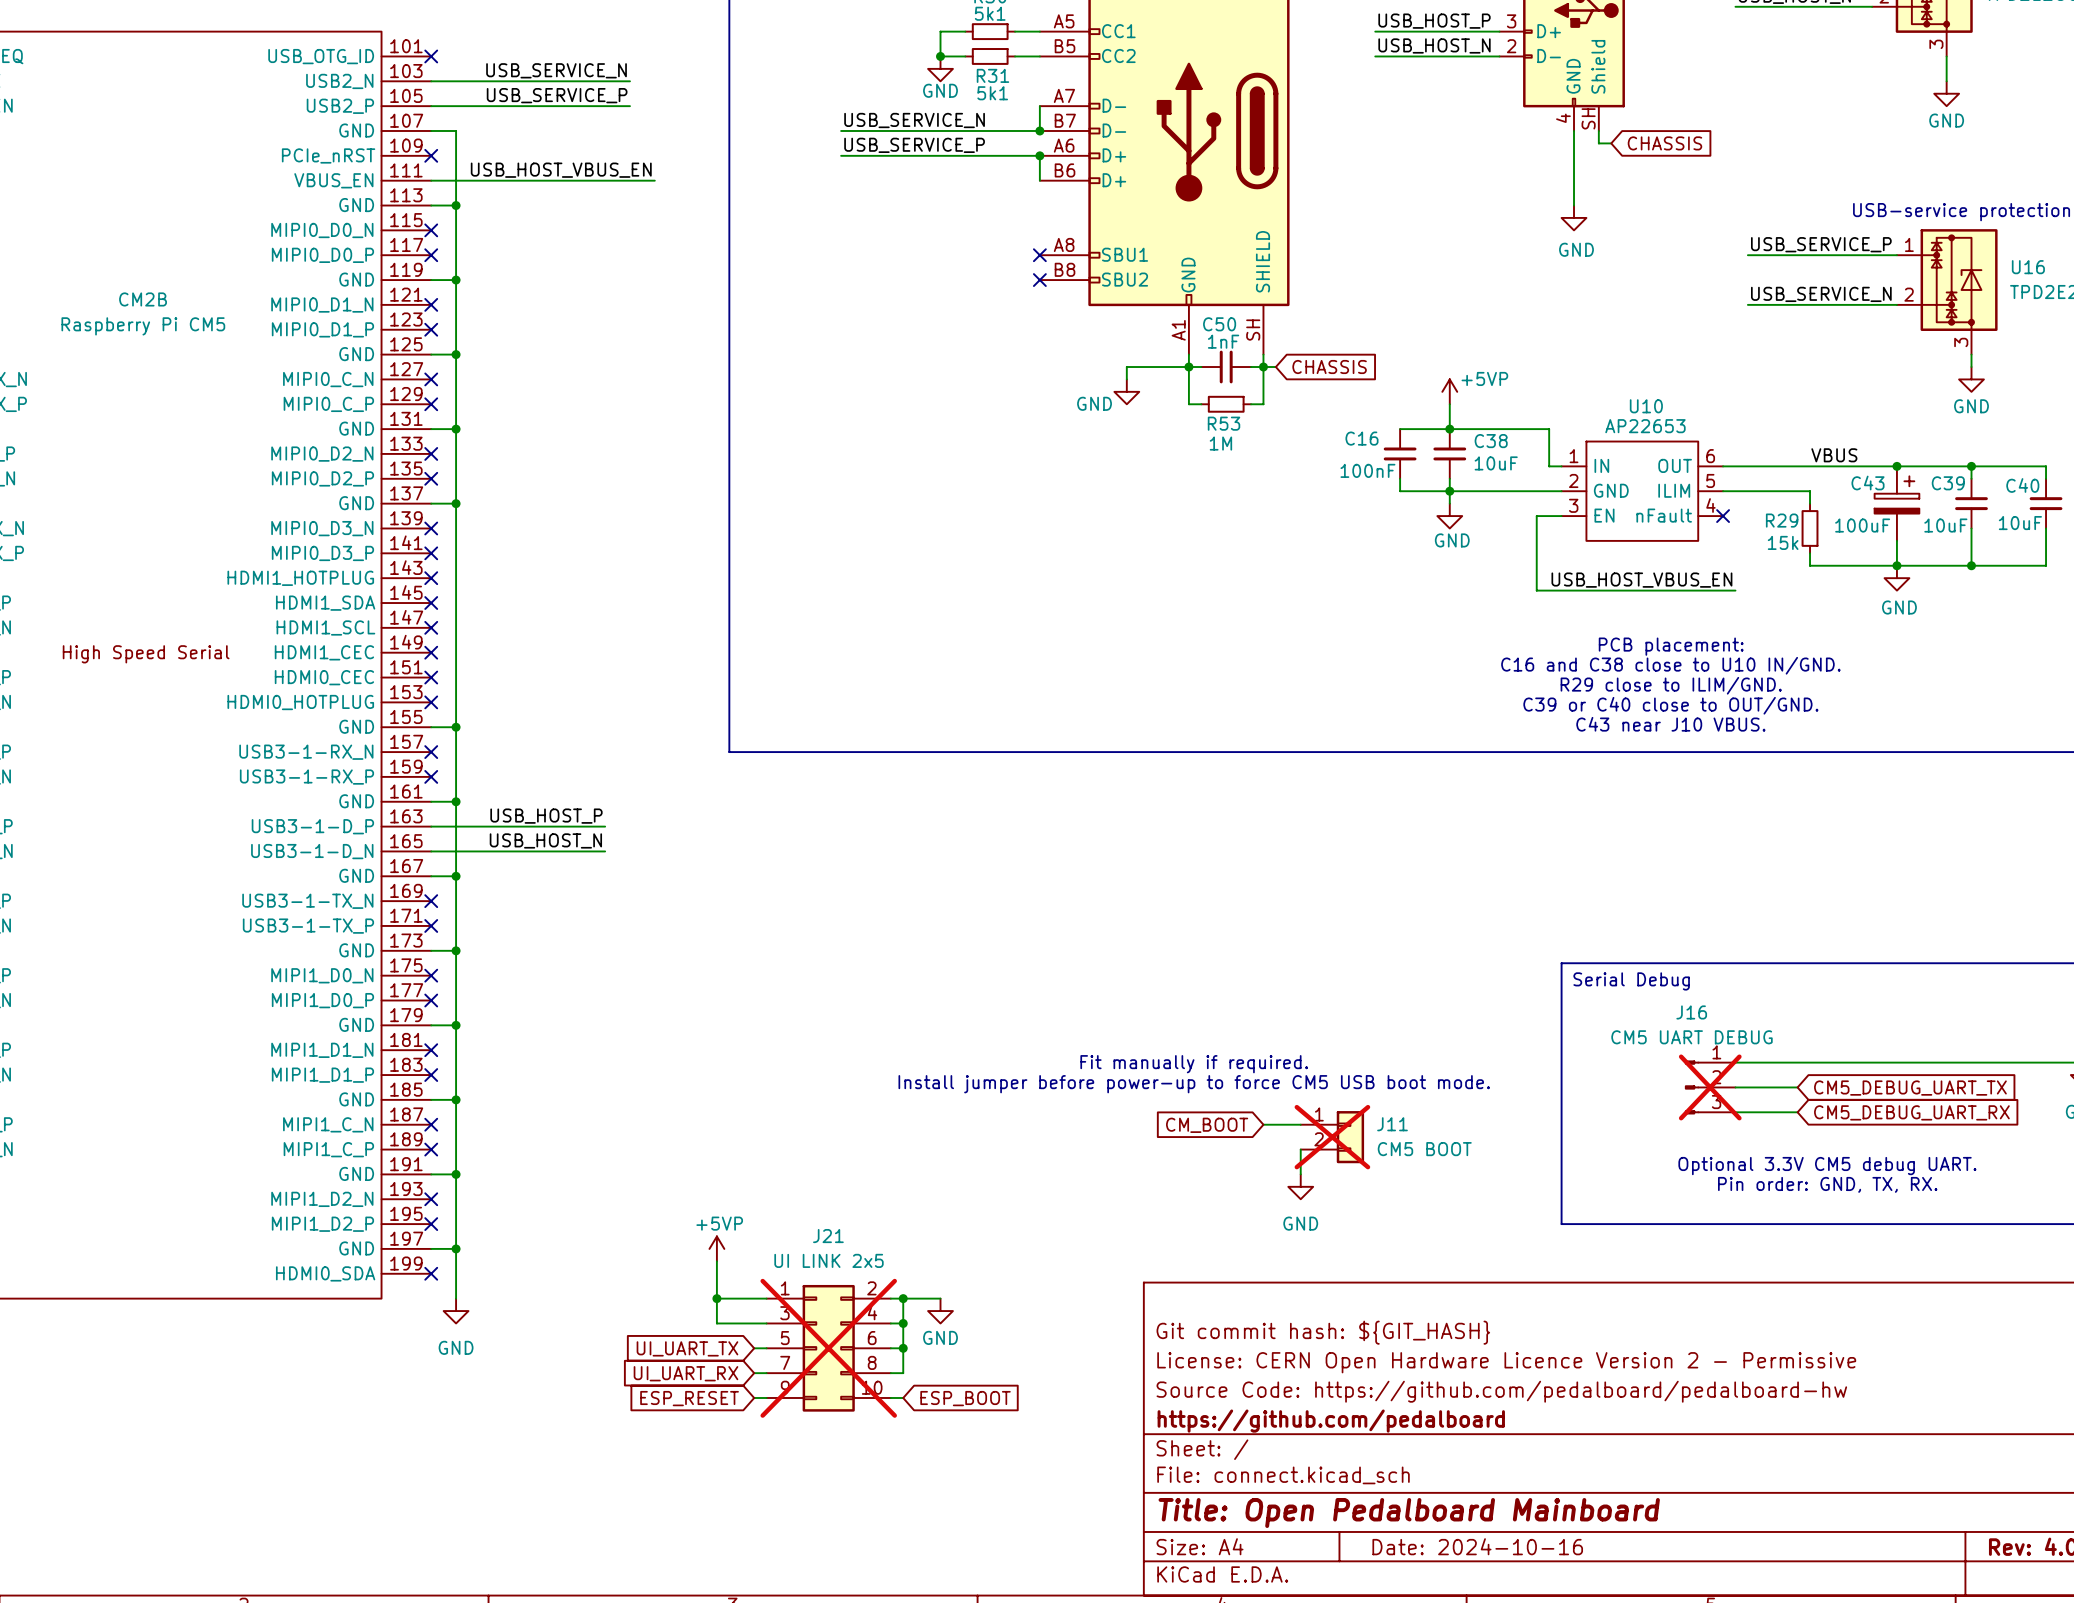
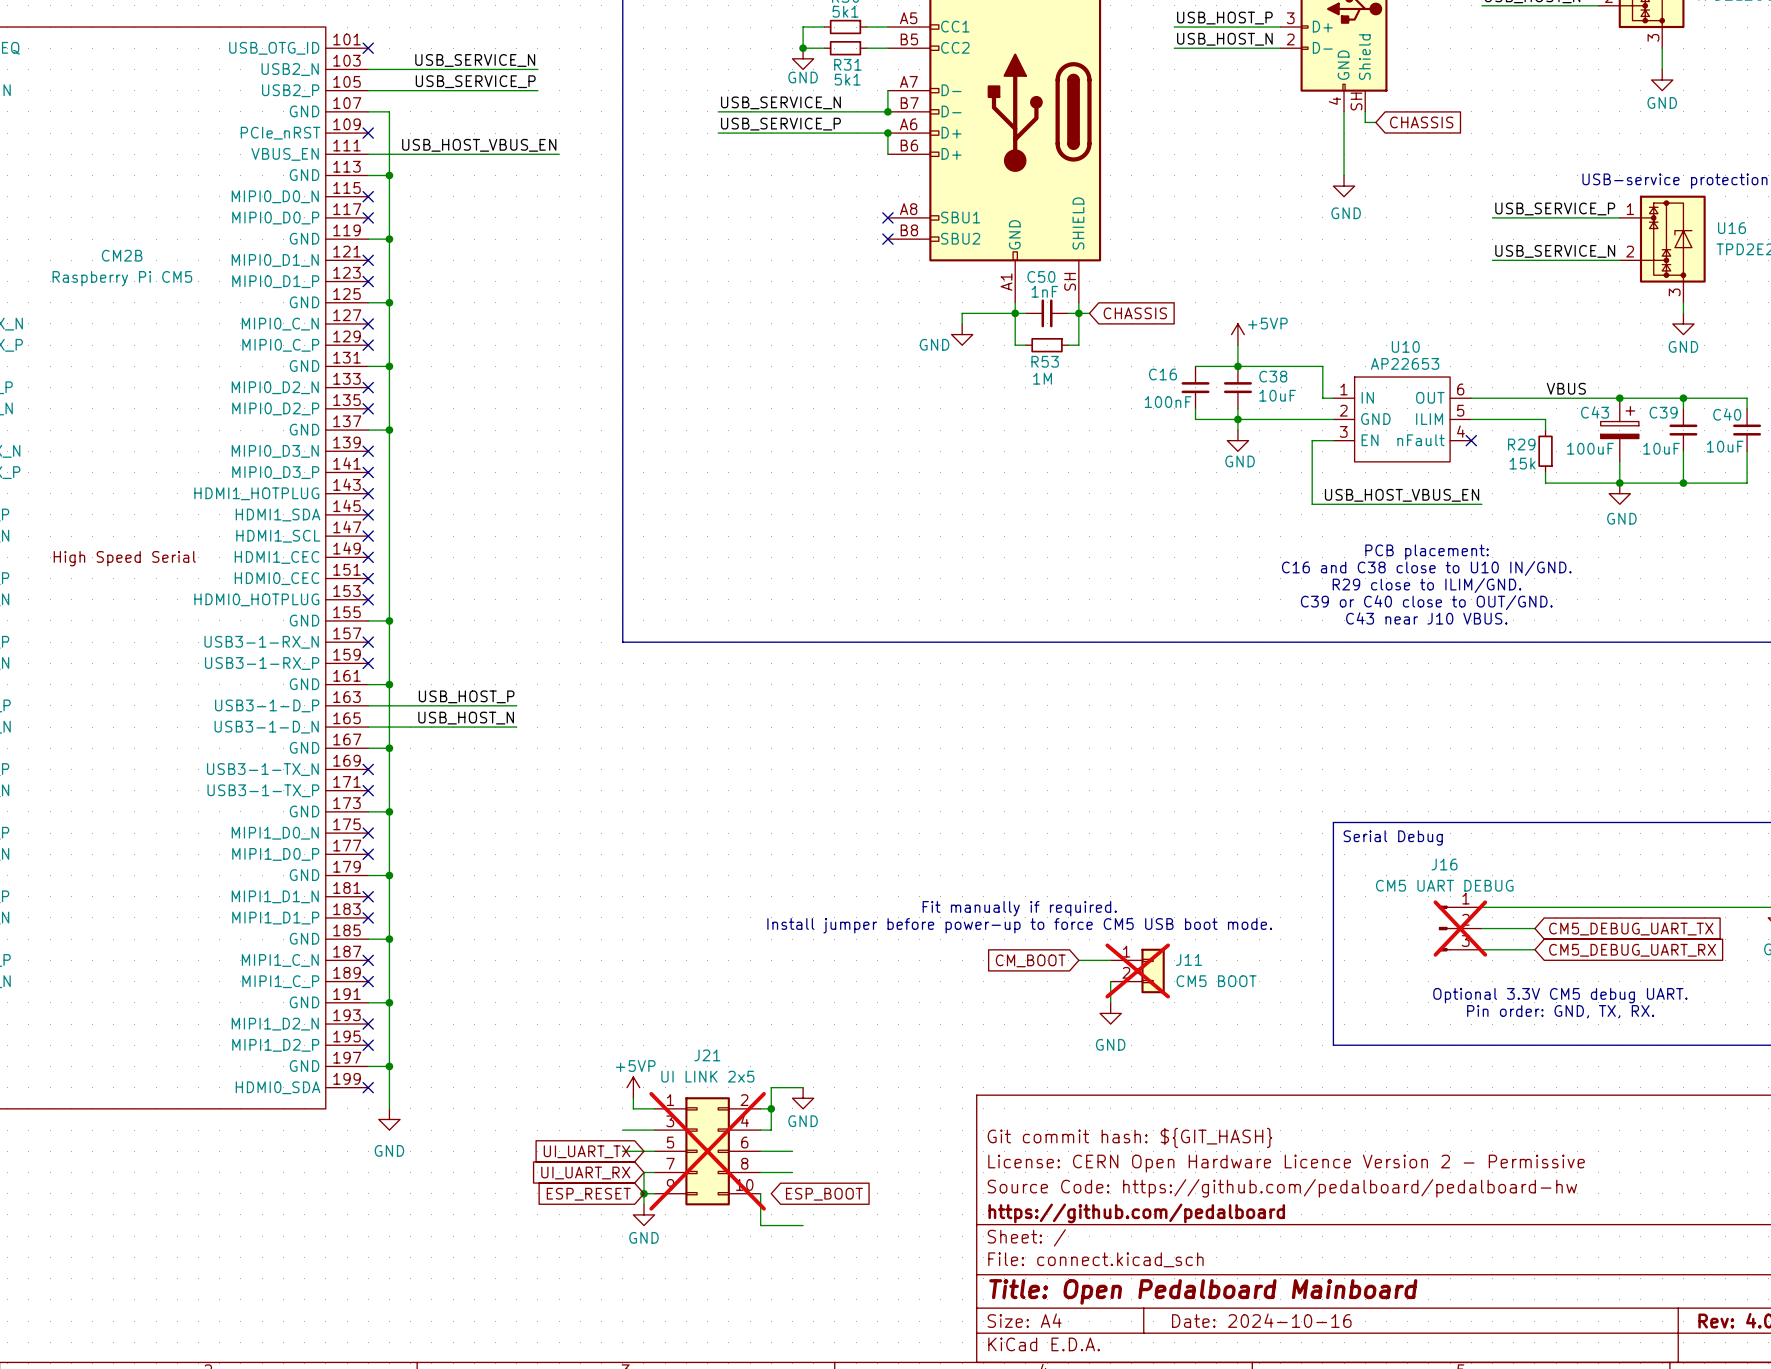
power symbol position: +5VP (716, 1248) -> +5VP (633, 1087)
wire: (716, 1261) (716, 1323) (729, 1323) -> none
wire: (716, 1298) (741, 1298) -> (633, 1098) (633, 1108)
junction: (716, 1298) -> none
wire: (903, 1298) (940, 1298) -> (771, 1108) (771, 1087) (803, 1087)
power symbol position: GND (940, 1311) -> GND (803, 1098)
wire: (903, 1323) (903, 1373) -> (792, 1172) (771, 1172)
junction: (903, 1323) -> none
wire: none -> (622, 1151) (643, 1151)
wire: none -> (771, 1151) (792, 1151)
junction: (903, 1348) -> none
wire: none -> (643, 1172) (643, 1204)
junction: none -> (643, 1193)
wire: (890, 1397) (903, 1397) -> (760, 1193) (760, 1225) (803, 1225)
power symbol: none -> GND (643, 1214)

